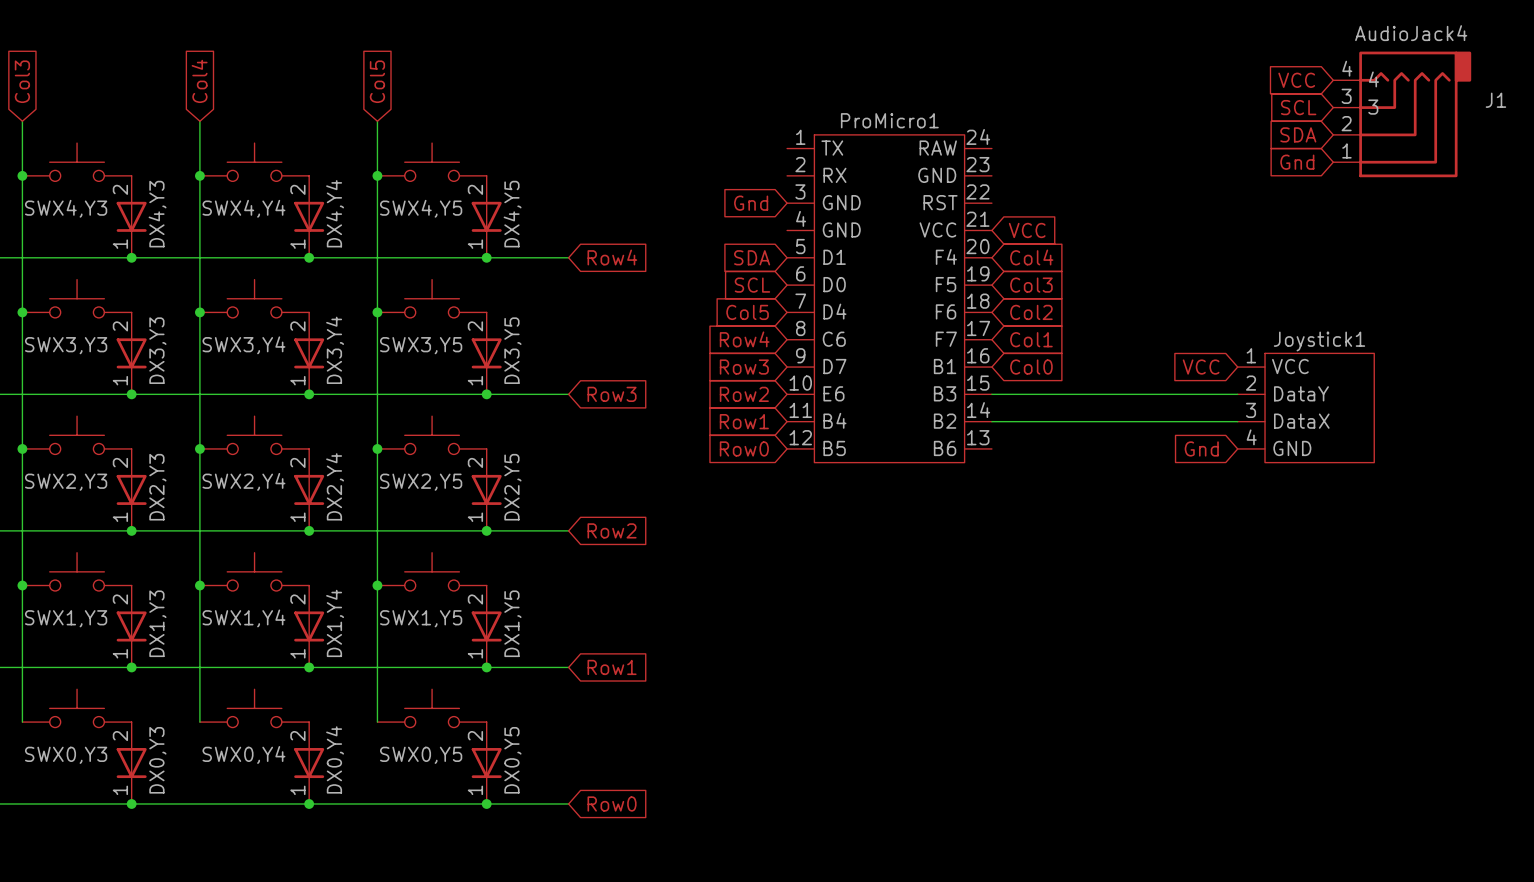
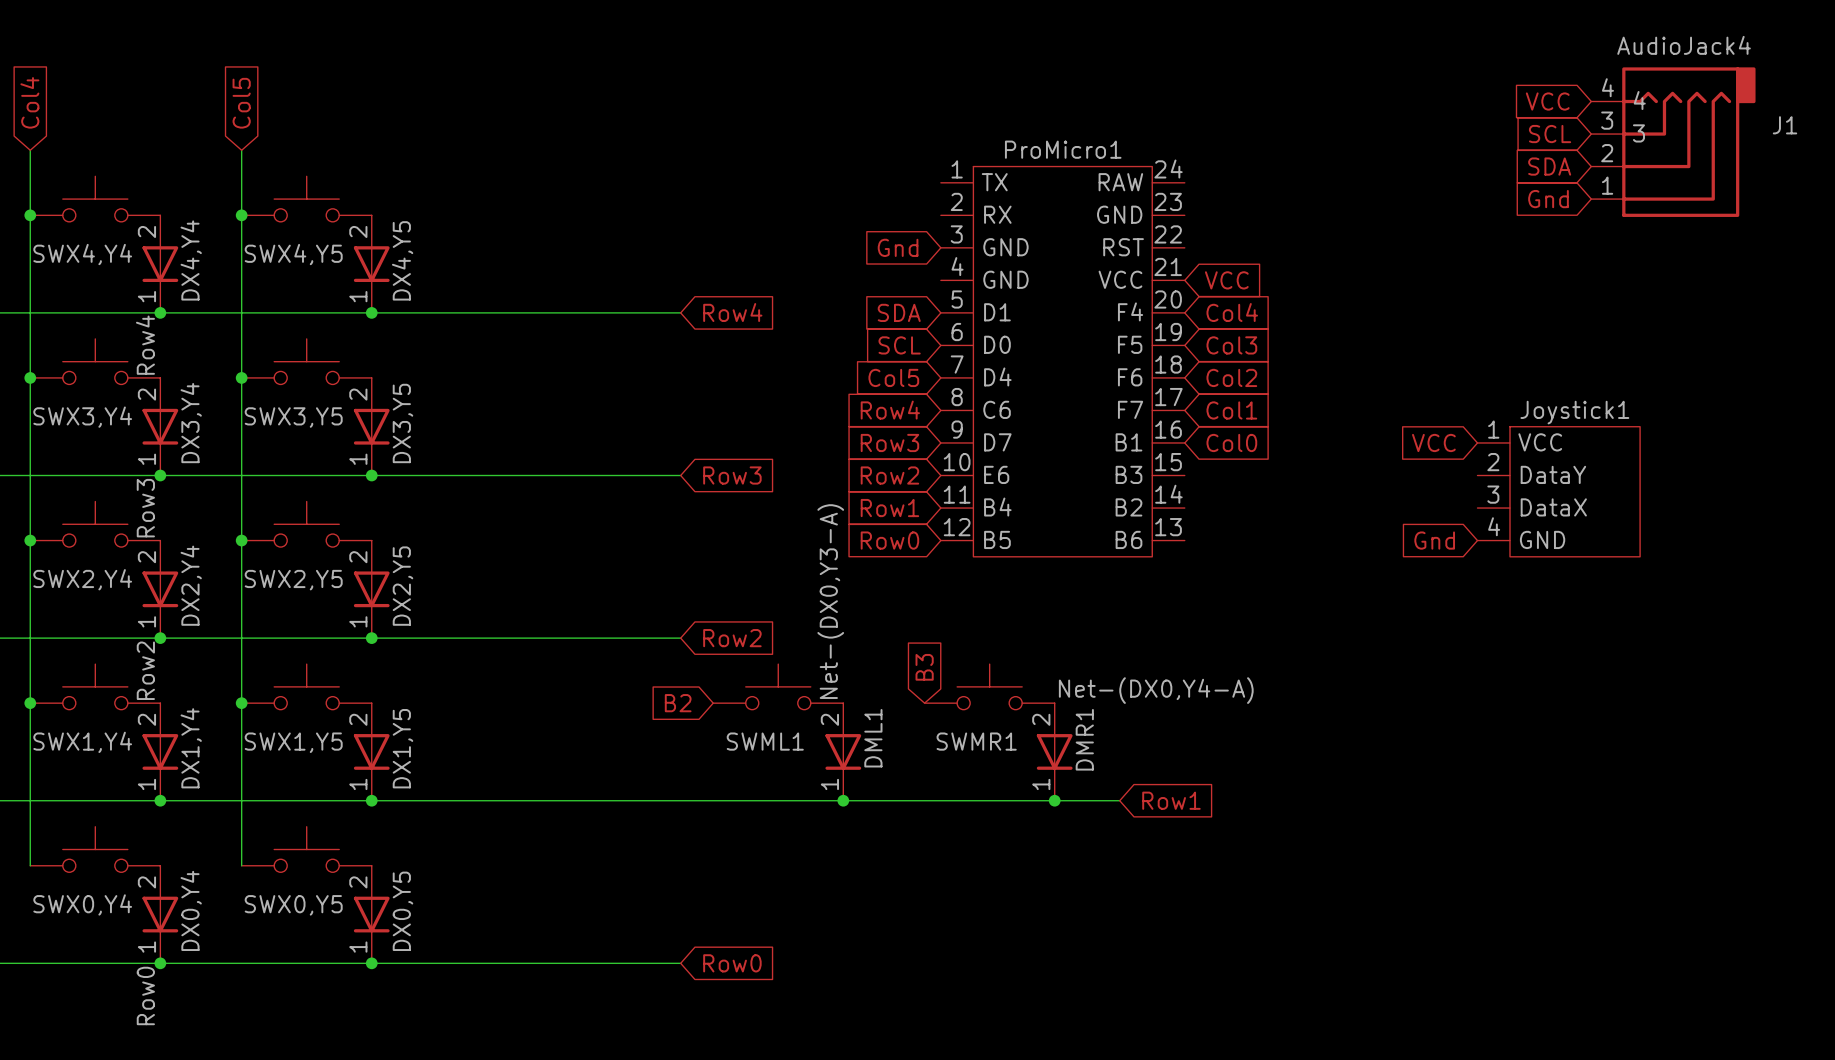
global label: Col3 (22, 81) -> Col4 (29, 102)
global label: Col4 (199, 81) -> Col5 (241, 103)
global label: Col5 (377, 81) -> none
wire: (377, 121) (377, 722) -> none
SWX4,Y5: (432, 162) -> none
junction: (377, 175) -> none
SWX4,Y3 name: SWX4,Y3 (66, 208) -> SWX4,Y4 (82, 254)
SWX4,Y4 name: SWX4,Y4 (243, 208) -> SWX4,Y5 (293, 254)
DX4,Y4 name: DX4,Y4 (335, 213) -> DX4,Y5 (402, 260)
DX4,Y3 name: DX4,Y3 (157, 214) -> DX4,Y4 (191, 260)
DX4,Y5: (486, 216) -> none
junction: (486, 257) -> none
label: none -> Row4 (145, 345)
SWX3,Y5: (432, 298) -> none
junction: (377, 312) -> none
SWX3,Y3 name: SWX3,Y3 (66, 345) -> SWX3,Y4 (82, 417)
SWX3,Y4 name: SWX3,Y4 (243, 345) -> SWX3,Y5 (293, 417)
DX3,Y3 name: DX3,Y3 (157, 350) -> DX3,Y4 (191, 423)
DX3,Y4 name: DX3,Y4 (335, 350) -> DX3,Y5 (402, 423)
DX3,Y5: (486, 353) -> none
junction: (486, 394) -> none
wire: (991, 394) (1237, 394) -> none
label: none -> Row3 (145, 508)
wire: (991, 421) (1237, 421) -> none
SWX2,Y5: (432, 435) -> none
junction: (377, 448) -> none
SWX2,Y4 name: SWX2,Y4 (243, 481) -> SWX2,Y5 (293, 580)
SWX2,Y3 name: SWX2,Y3 (66, 482) -> SWX2,Y4 (82, 579)
DX2,Y4 name: DX2,Y4 (335, 486) -> DX2,Y5 (402, 586)
DX2,Y3 name: DX2,Y3 (157, 487) -> DX2,Y4 (191, 585)
DX2,Y5: (486, 489) -> none
label: none -> Net-(DX0,Y3-A) (830, 601)
junction: (486, 530) -> none
global label: none -> B3 (924, 667)
label: none -> Row2 (145, 670)
SWX1,Y5: (432, 571) -> none
SWML1: none -> (778, 686)
SWMR1: none -> (989, 686)
label: none -> Net-(DX0,Y4-A) (1156, 690)
junction: (377, 585) -> none
global label: none -> B2 (678, 703)
SWX1,Y3 name: SWX1,Y3 (66, 618) -> SWX1,Y4 (82, 742)
SWX1,Y4 name: SWX1,Y4 (243, 618) -> SWX1,Y5 (293, 742)
DX1,Y3 name: DX1,Y3 (157, 623) -> DX1,Y4 (191, 748)
DX1,Y4 name: DX1,Y4 (335, 623) -> DX1,Y5 (402, 748)
DX1,Y5: (486, 626) -> none
DML1: none -> (843, 751)
DMR1: none -> (1054, 751)
junction: (486, 667) -> none
wire: none -> (680, 800) (1119, 800)
global label: Row1 (612, 667) -> none
junction: none -> (843, 800)
junction: none -> (1054, 800)
global label: none -> Row1 (1171, 800)
SWX0,Y5: (432, 708) -> none
SWX0,Y4 name: SWX0,Y4 (243, 754) -> SWX0,Y5 (293, 905)
SWX0,Y3 name: SWX0,Y3 (66, 755) -> SWX0,Y4 (82, 904)
DX0,Y4 name: DX0,Y4 (335, 759) -> DX0,Y5 (402, 911)
DX0,Y3 name: DX0,Y3 (157, 760) -> DX0,Y4 (191, 910)
DX0,Y5: (486, 763) -> none
junction: (486, 803) -> none
label: none -> Row0 (145, 995)

